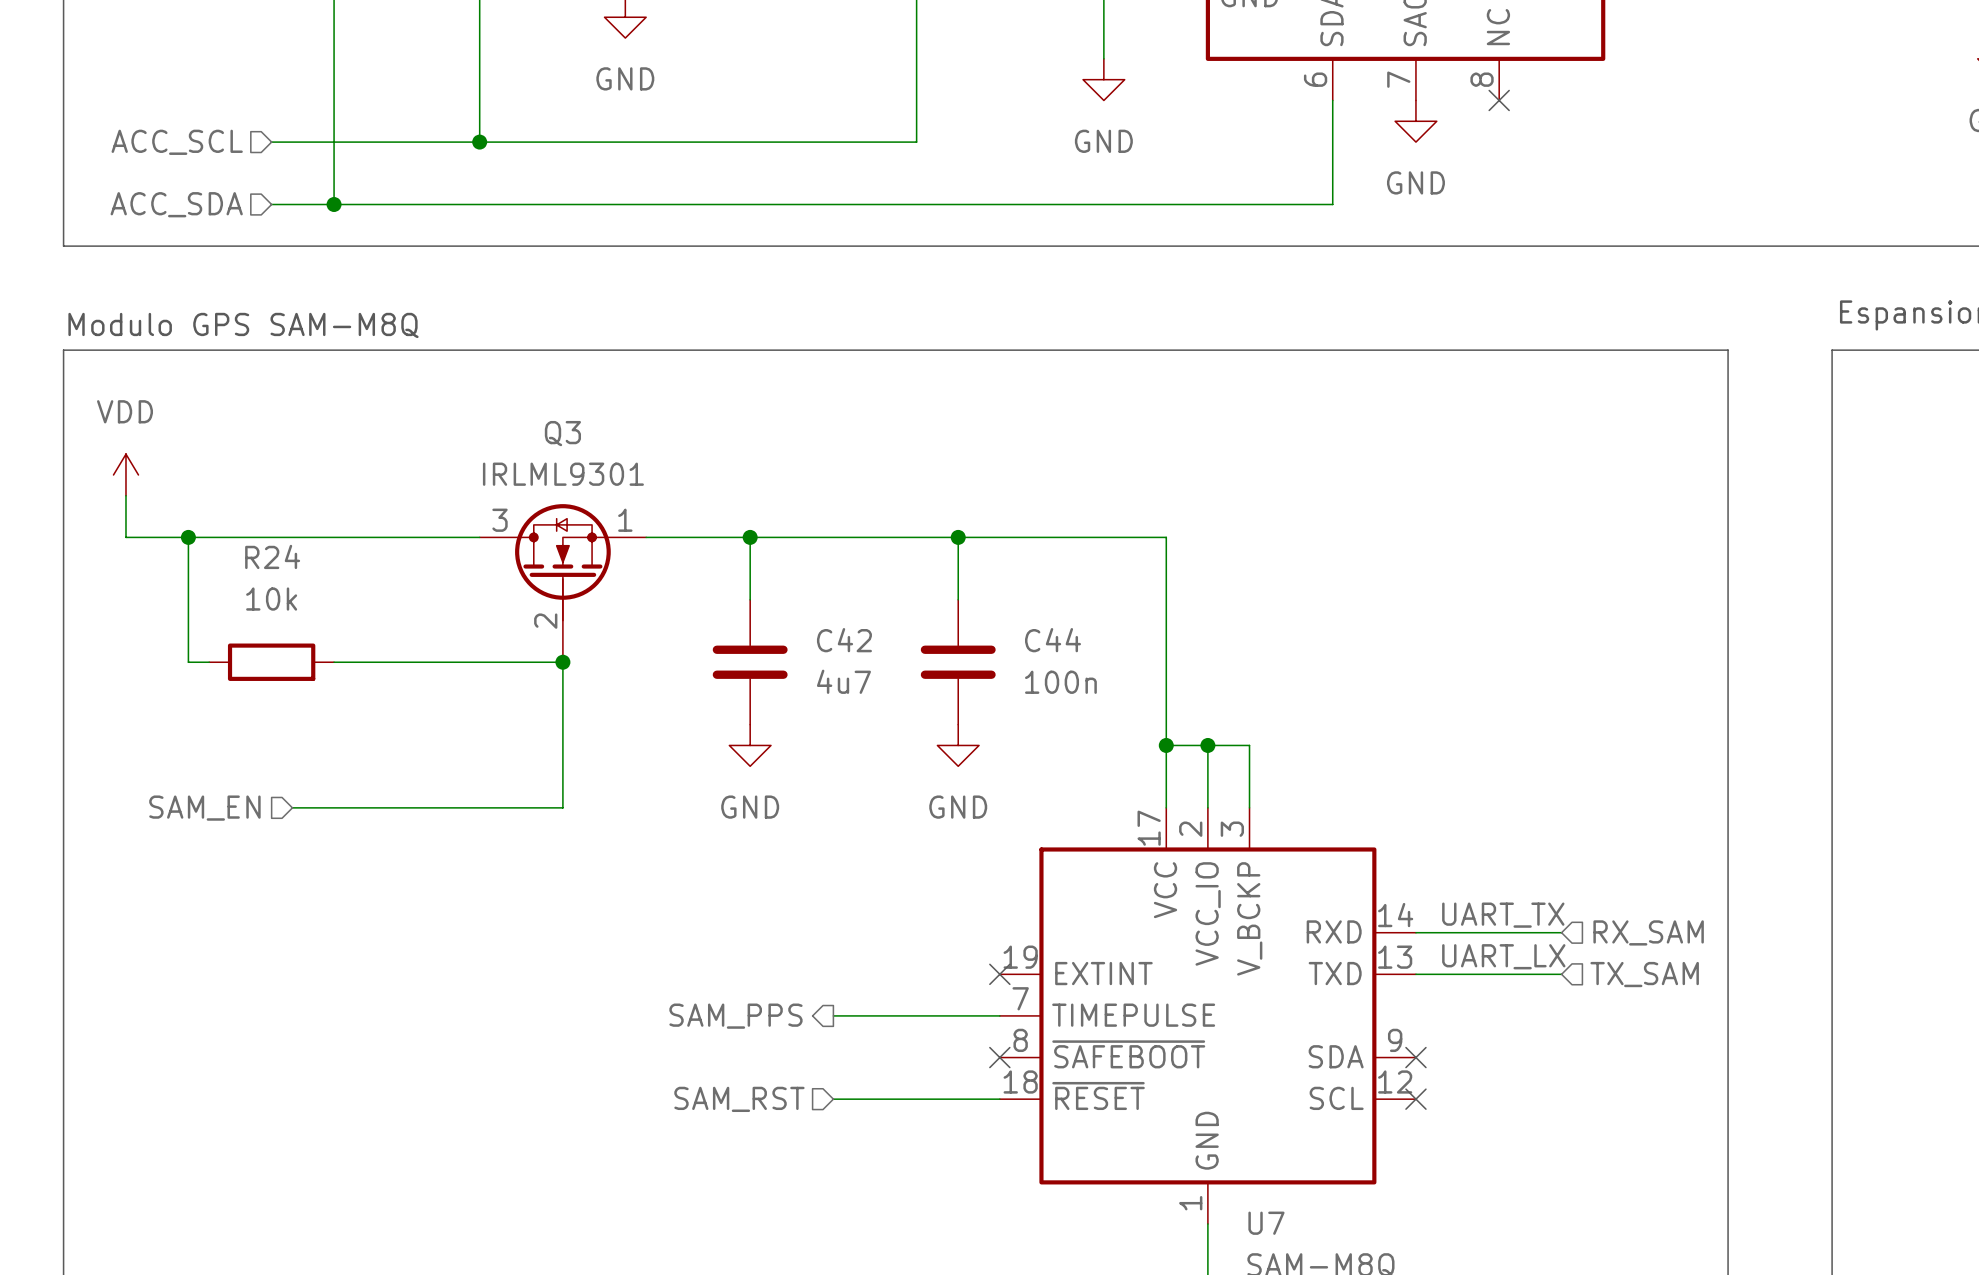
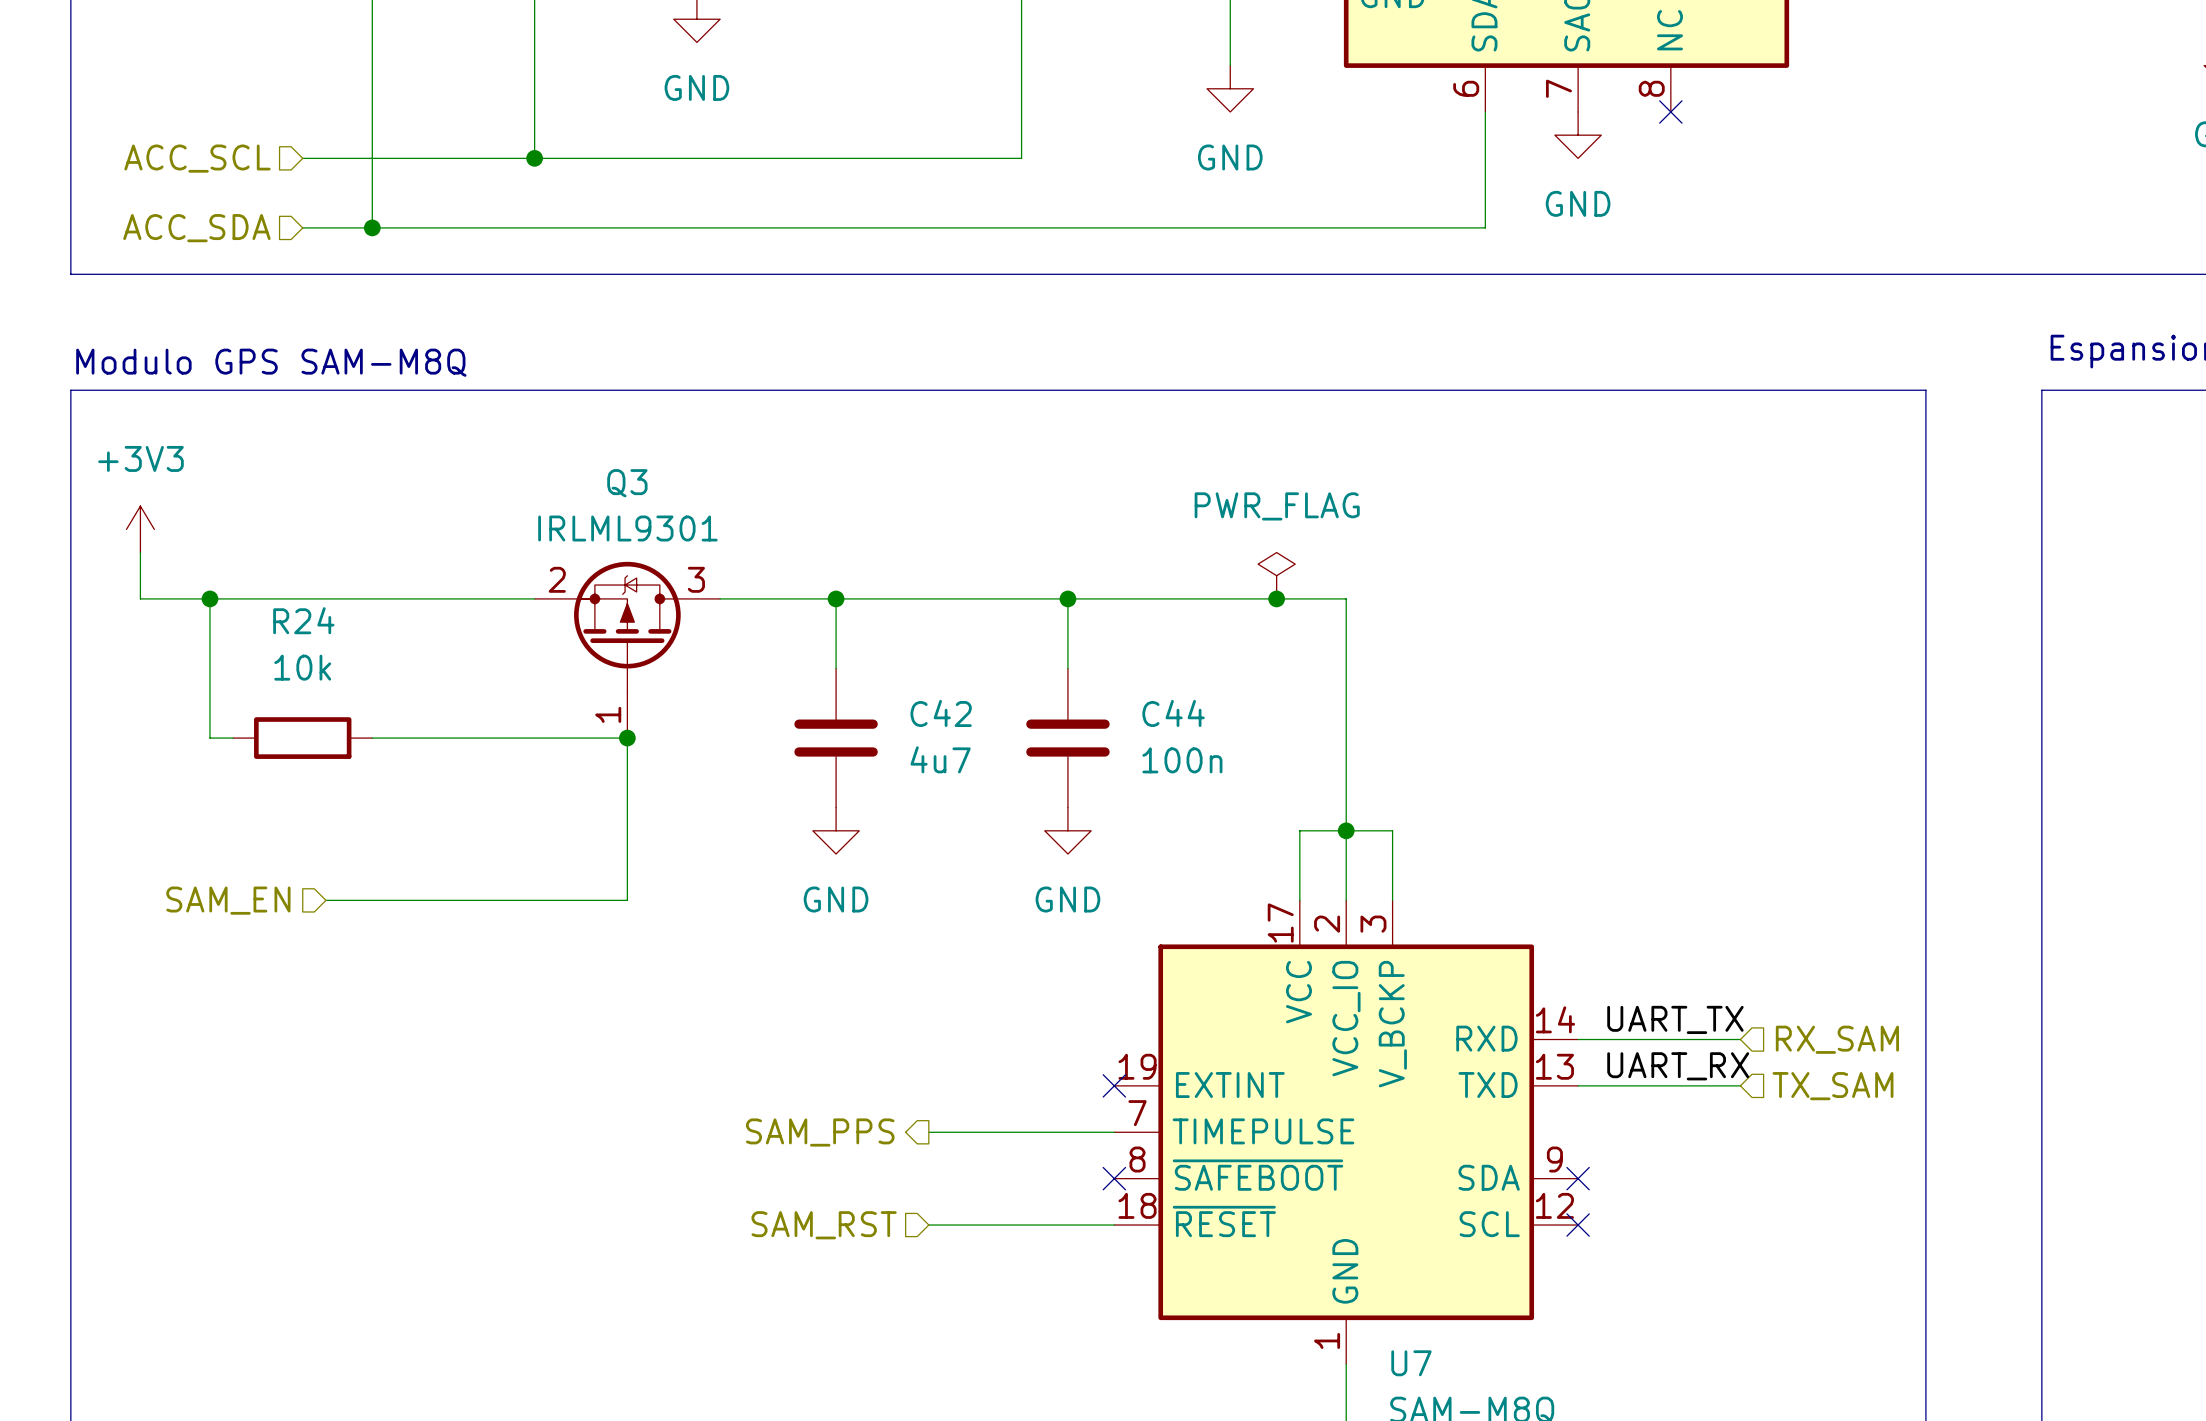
power symbol: VDD (125, 474) -> +3V3 (140, 529)
Q3 symbol: [479, 504, 647, 663] -> [534, 561, 721, 739]
power symbol: none -> PWR_FLAG (1276, 575)
junction: none -> (1276, 598)
wire: (1166, 537) (1166, 745) -> (1299, 598) (1346, 598) (1346, 830)
junction: (1166, 745) -> none
label: UART_LX (1503, 956) -> UART_RX (1678, 1066)

